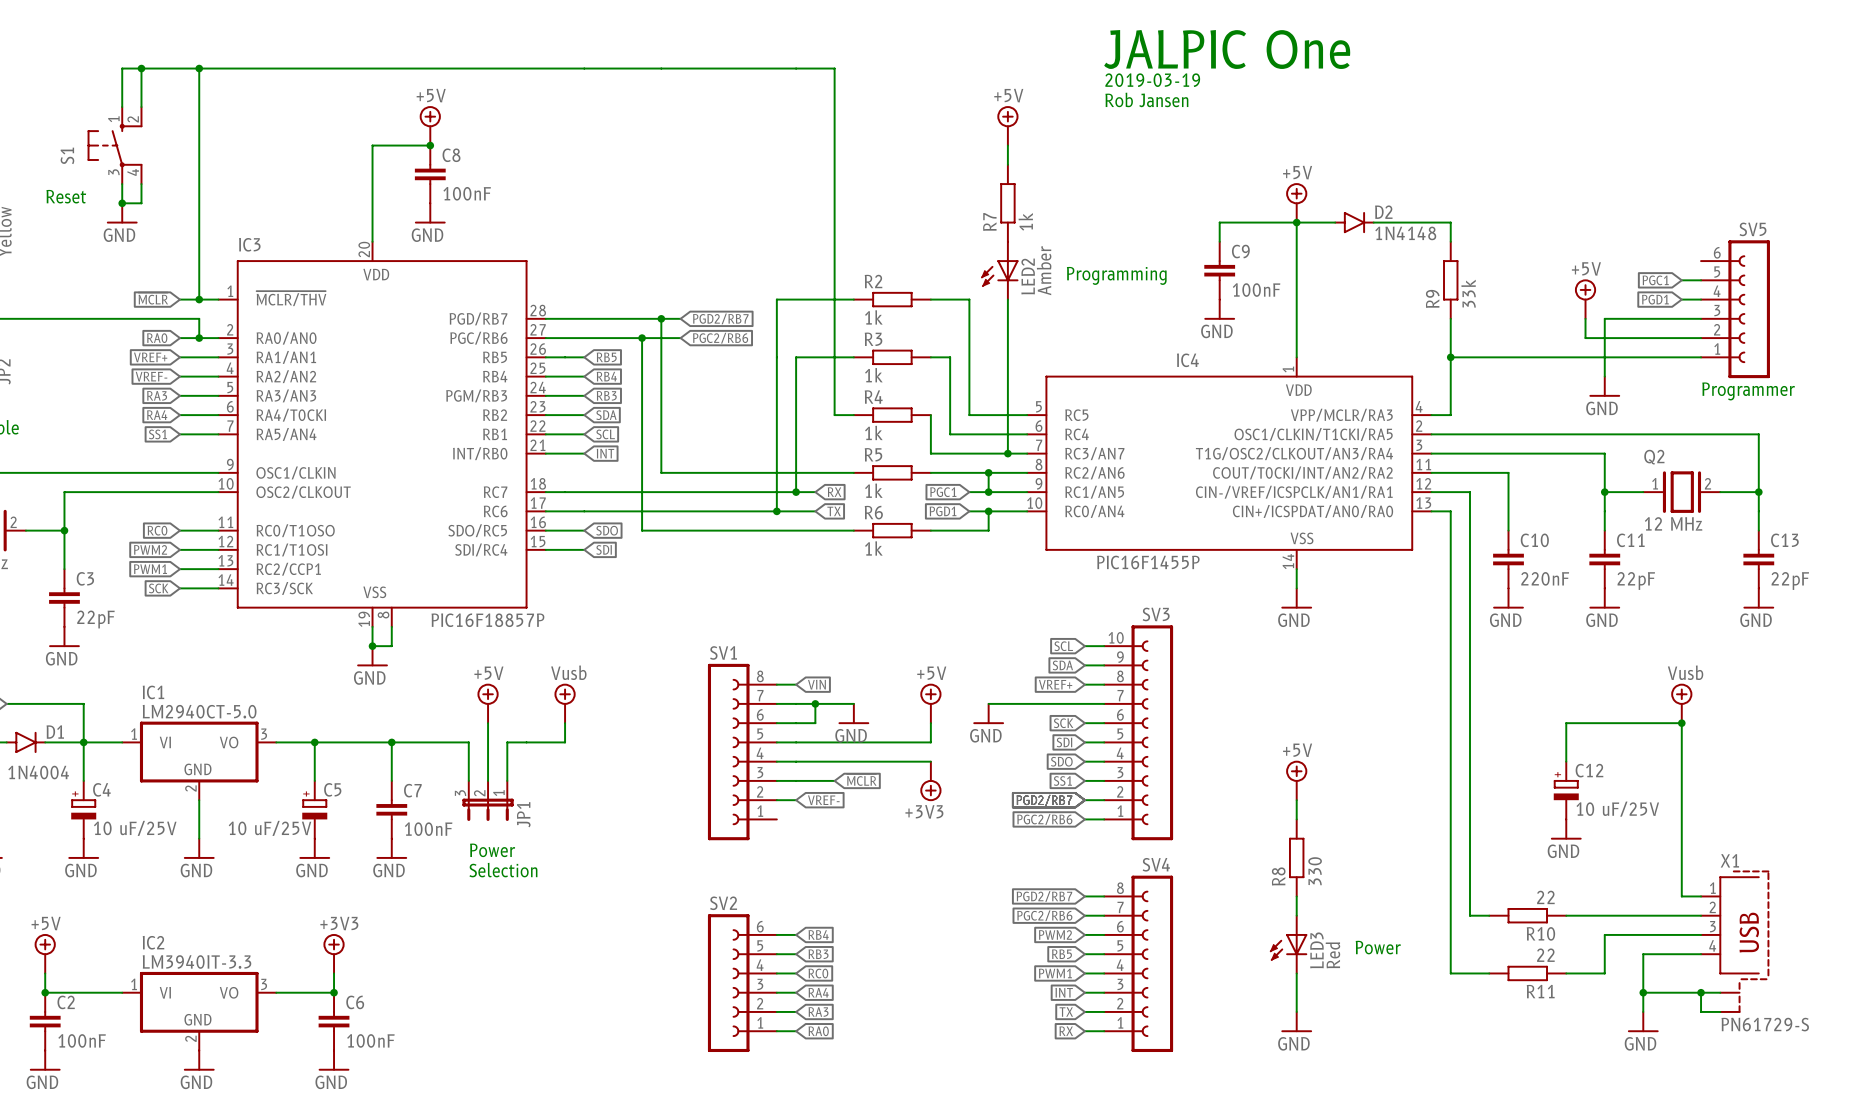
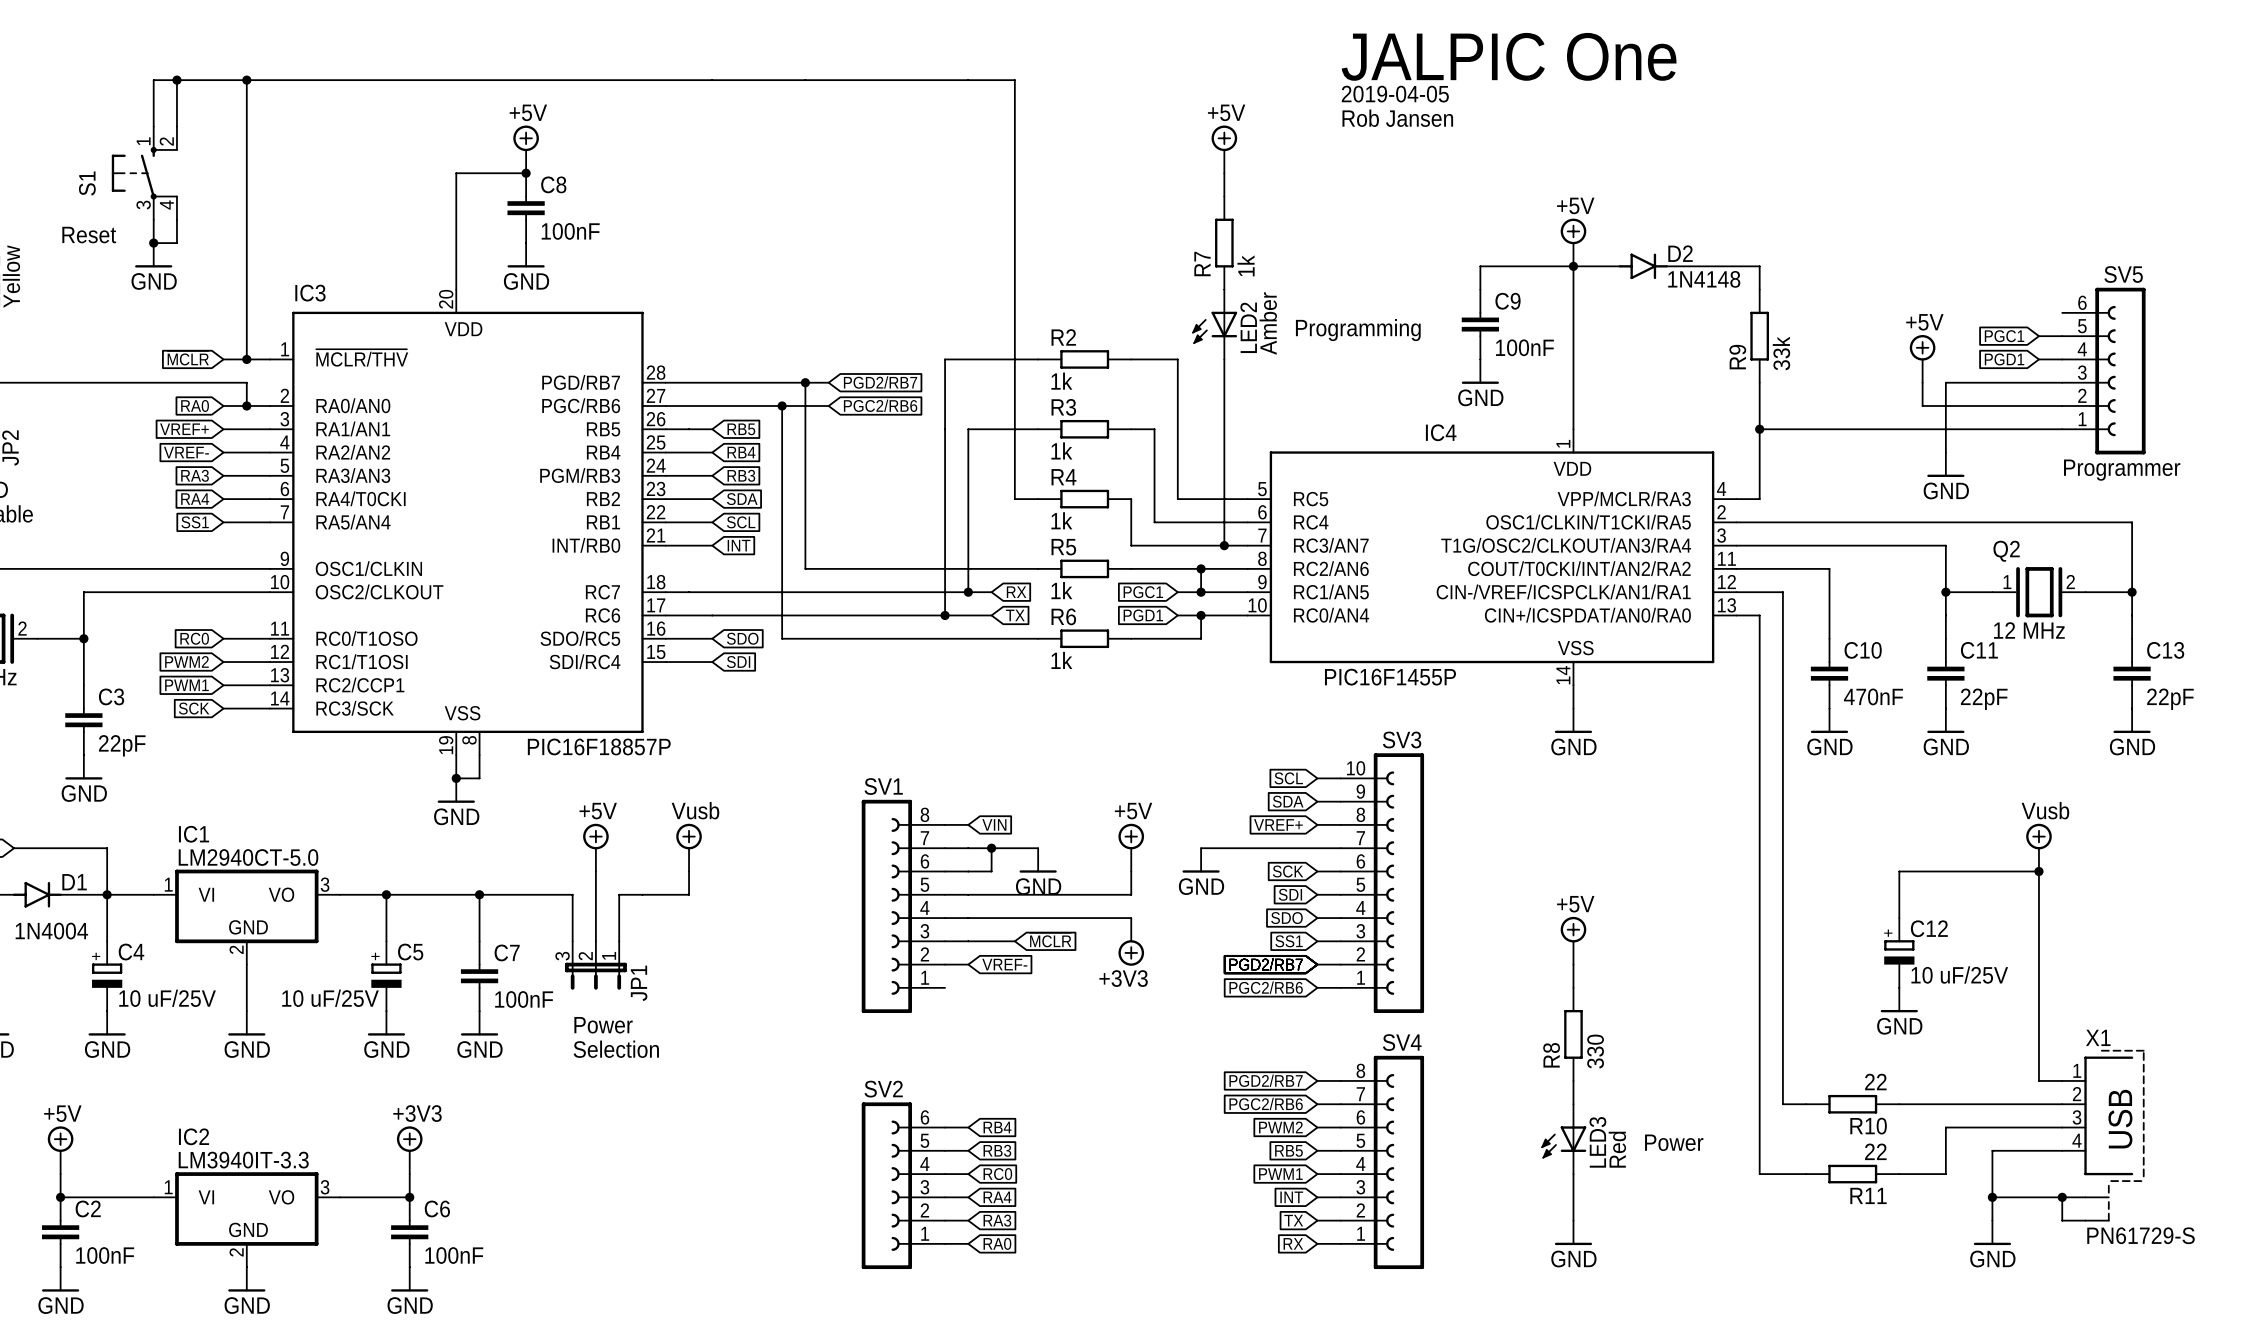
text: 2019-03-19 (1152, 80) -> 2019-04-05 (1395, 94)
C10 value: 220nF (1545, 578) -> 470nF (1873, 696)

